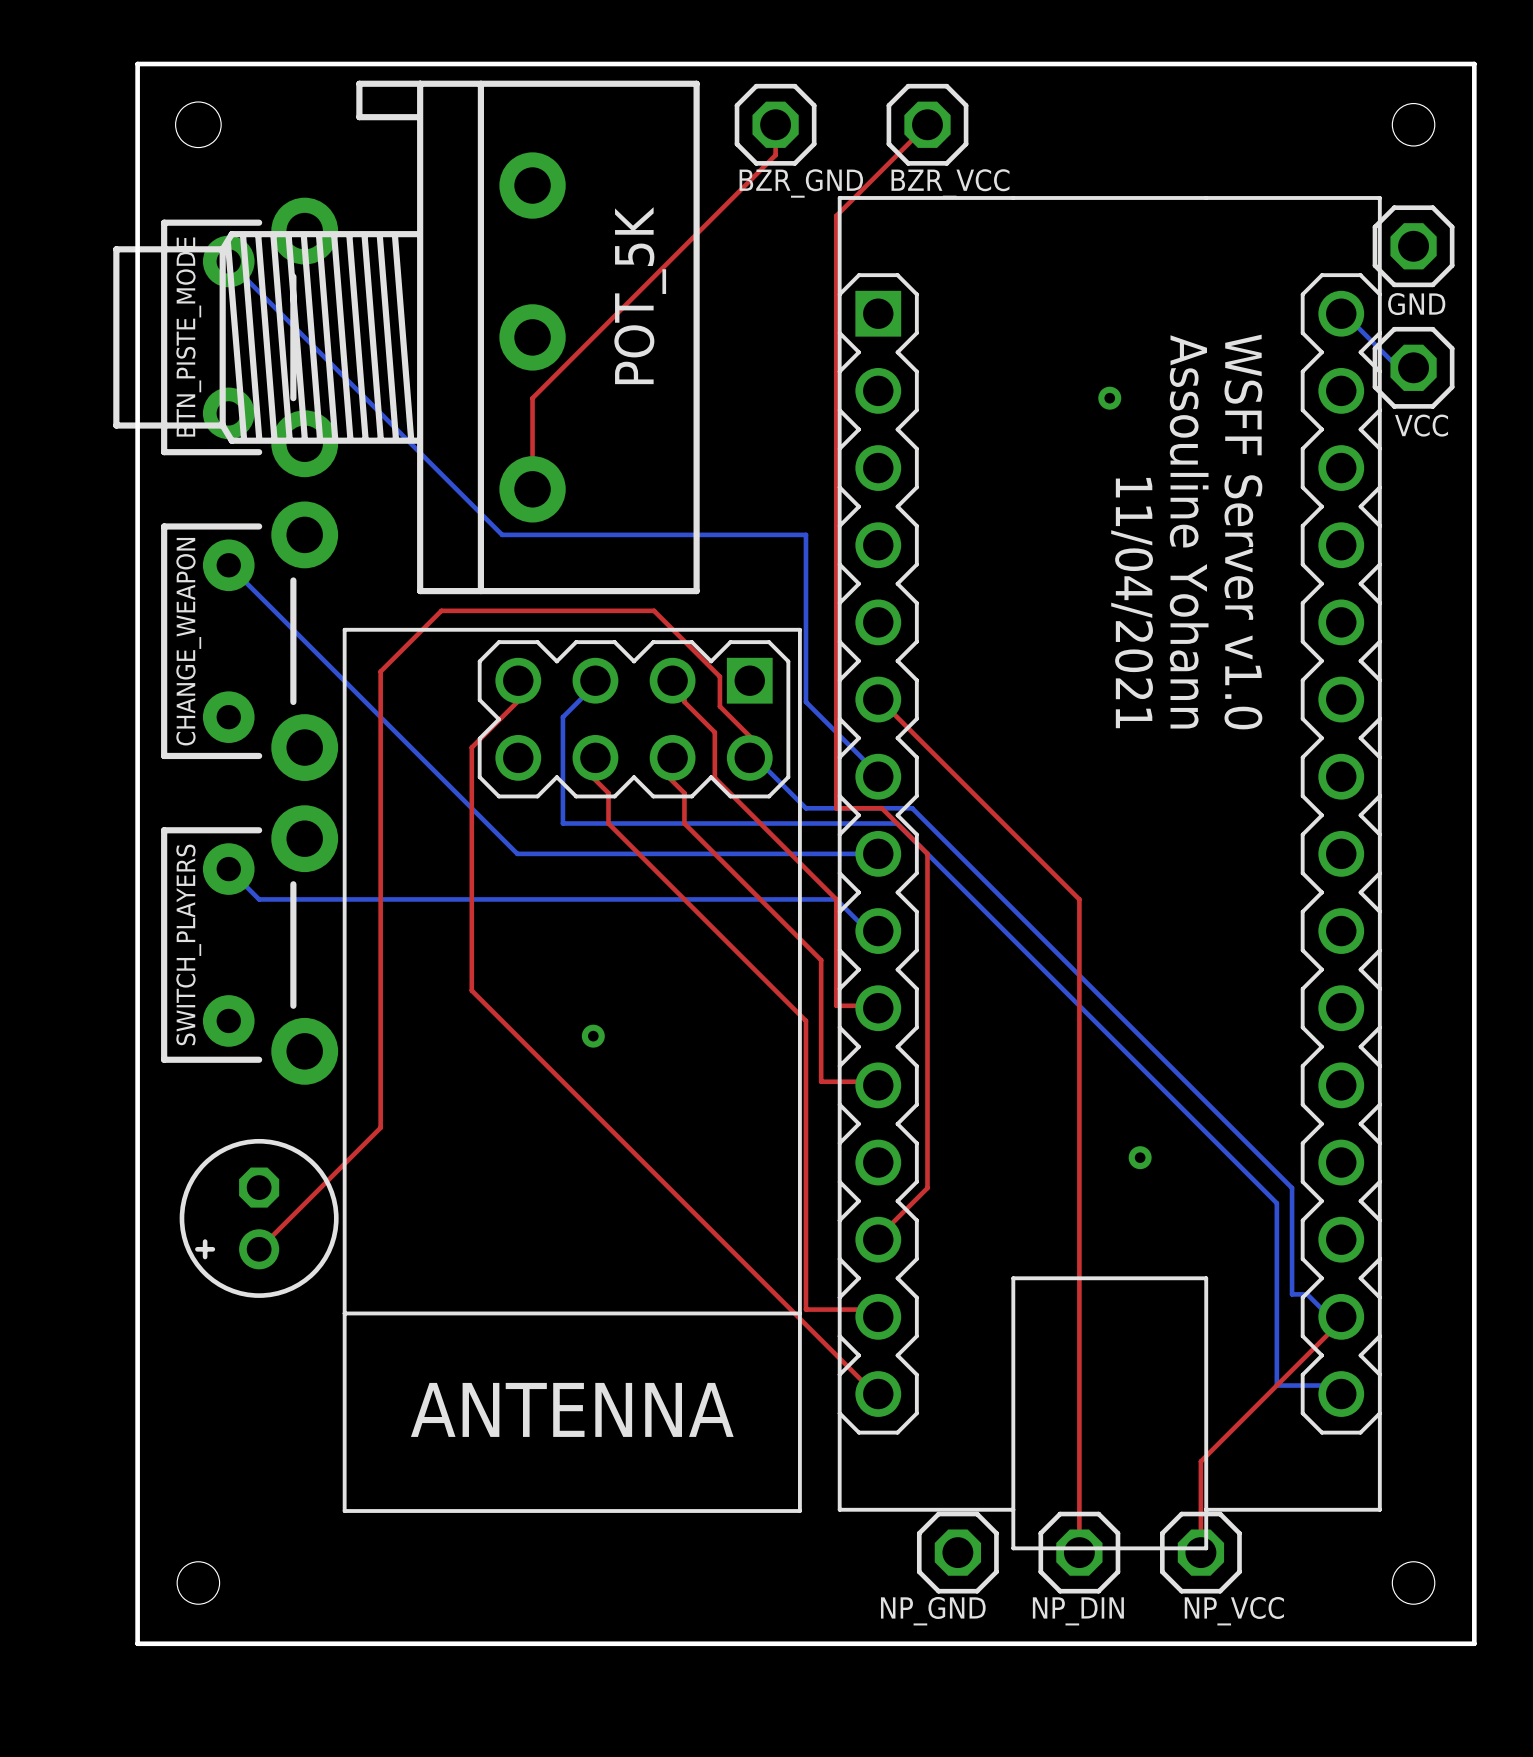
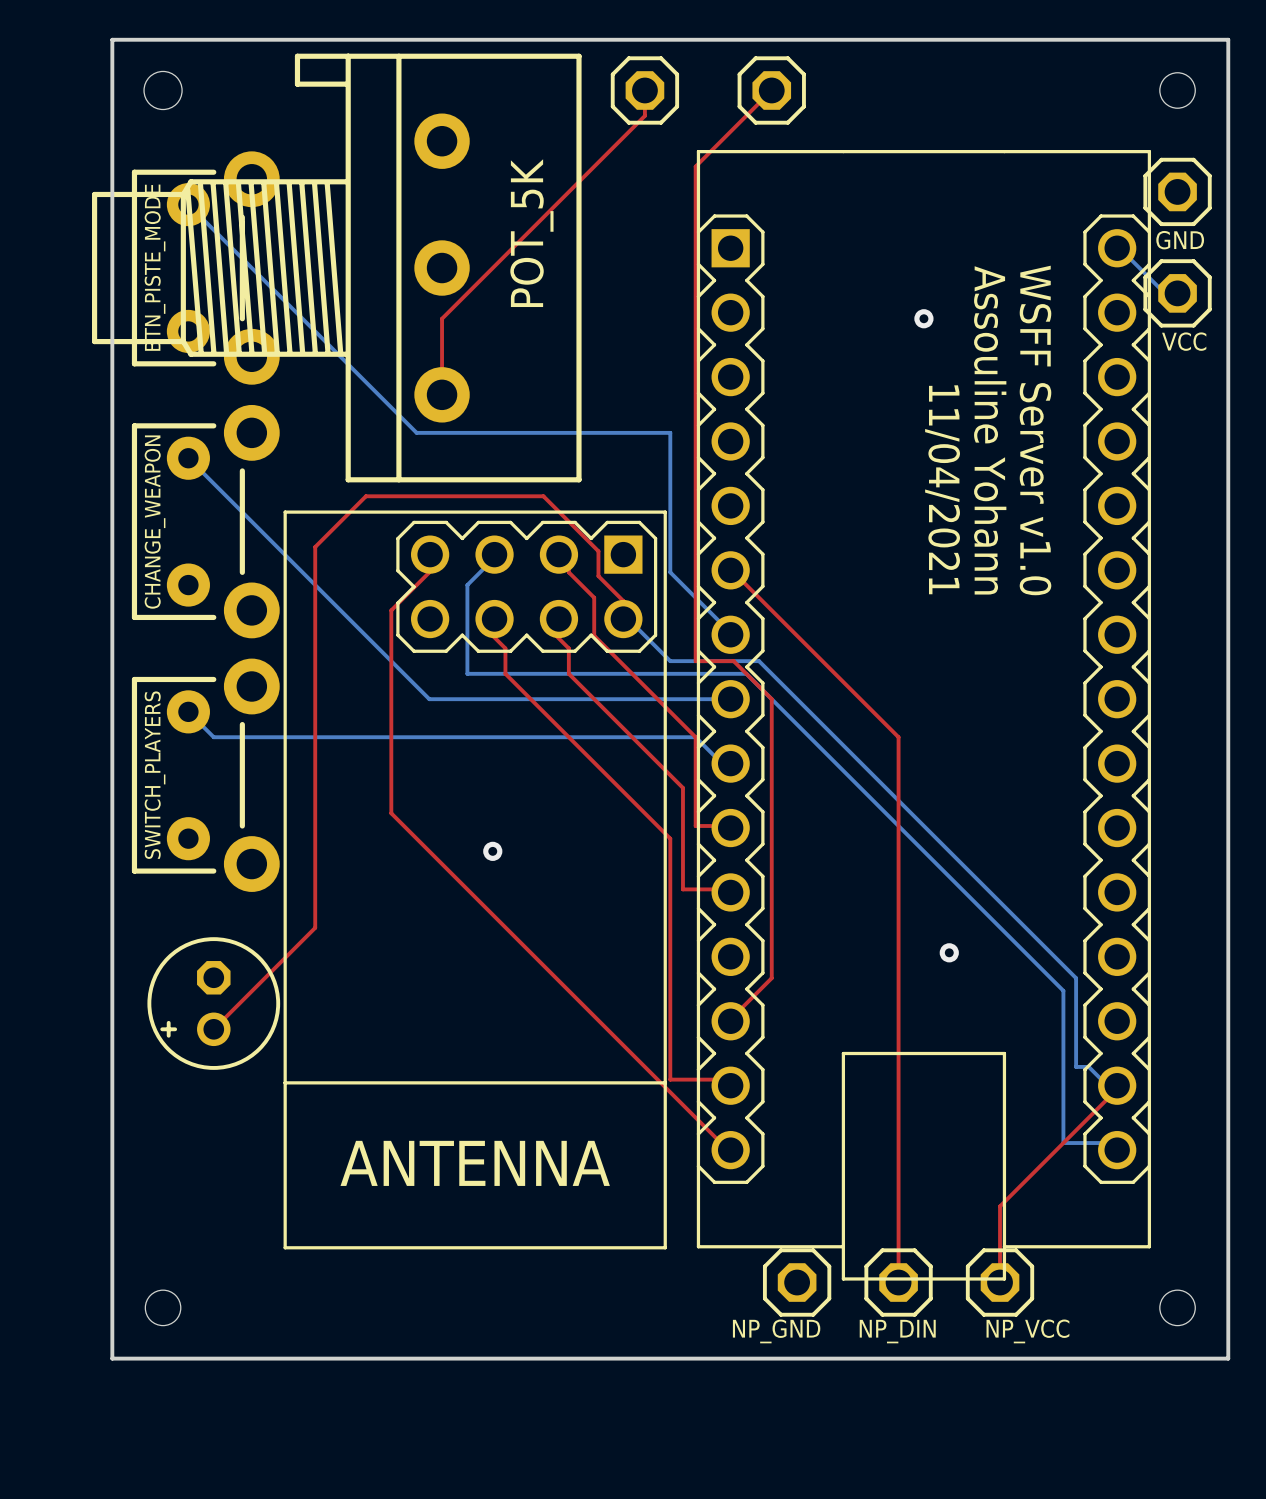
part value: BZR_GND (801, 183) -> none
part value: BZR_VCC (950, 183) -> none

